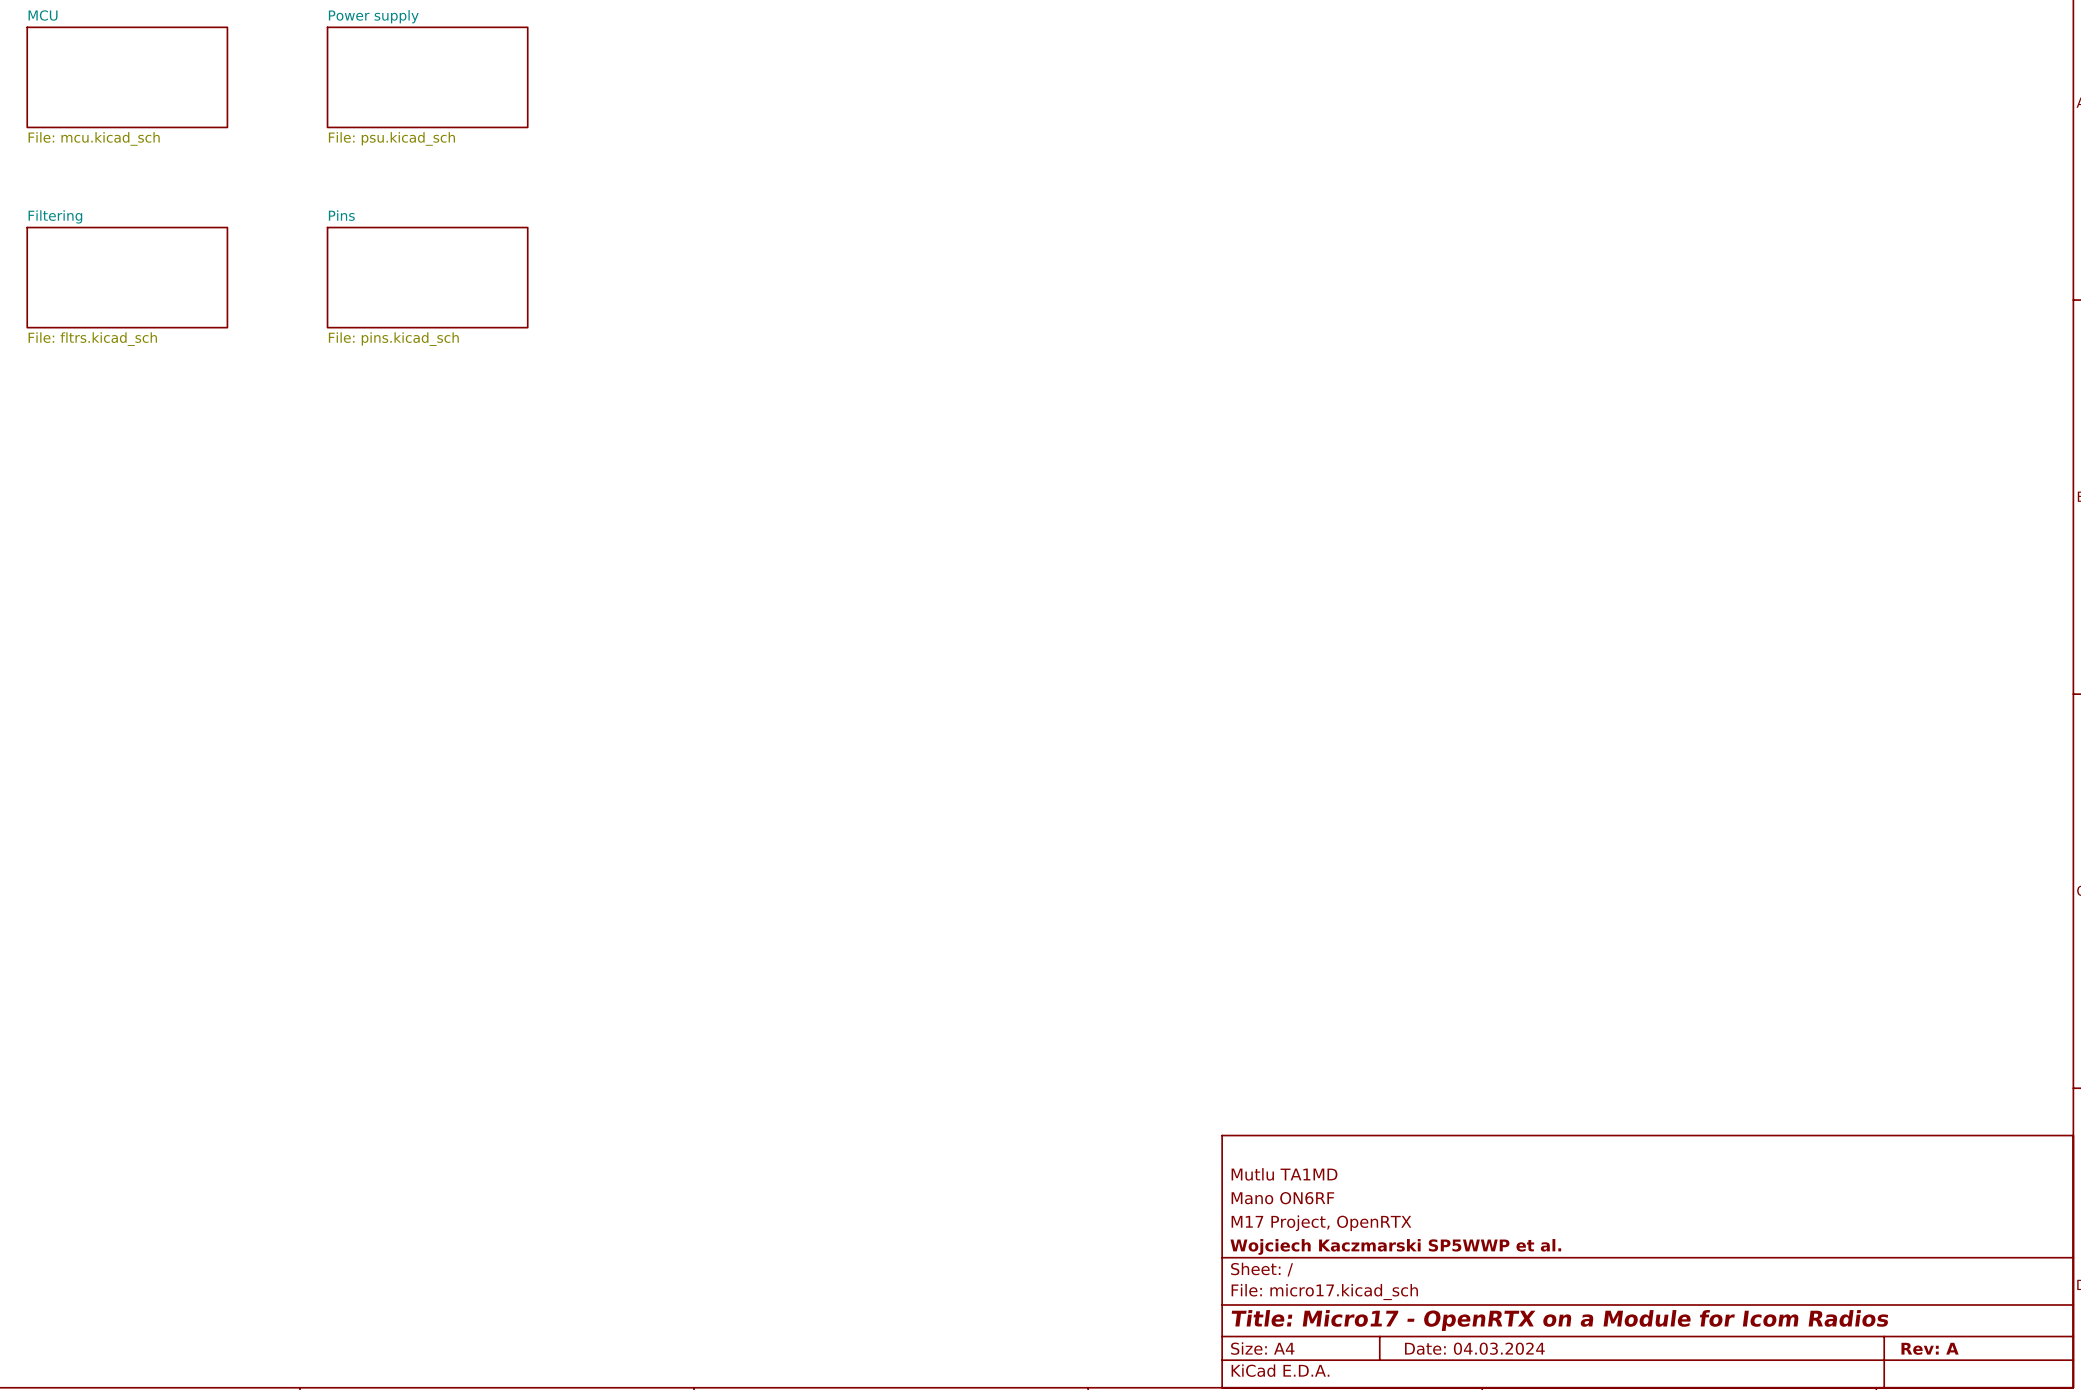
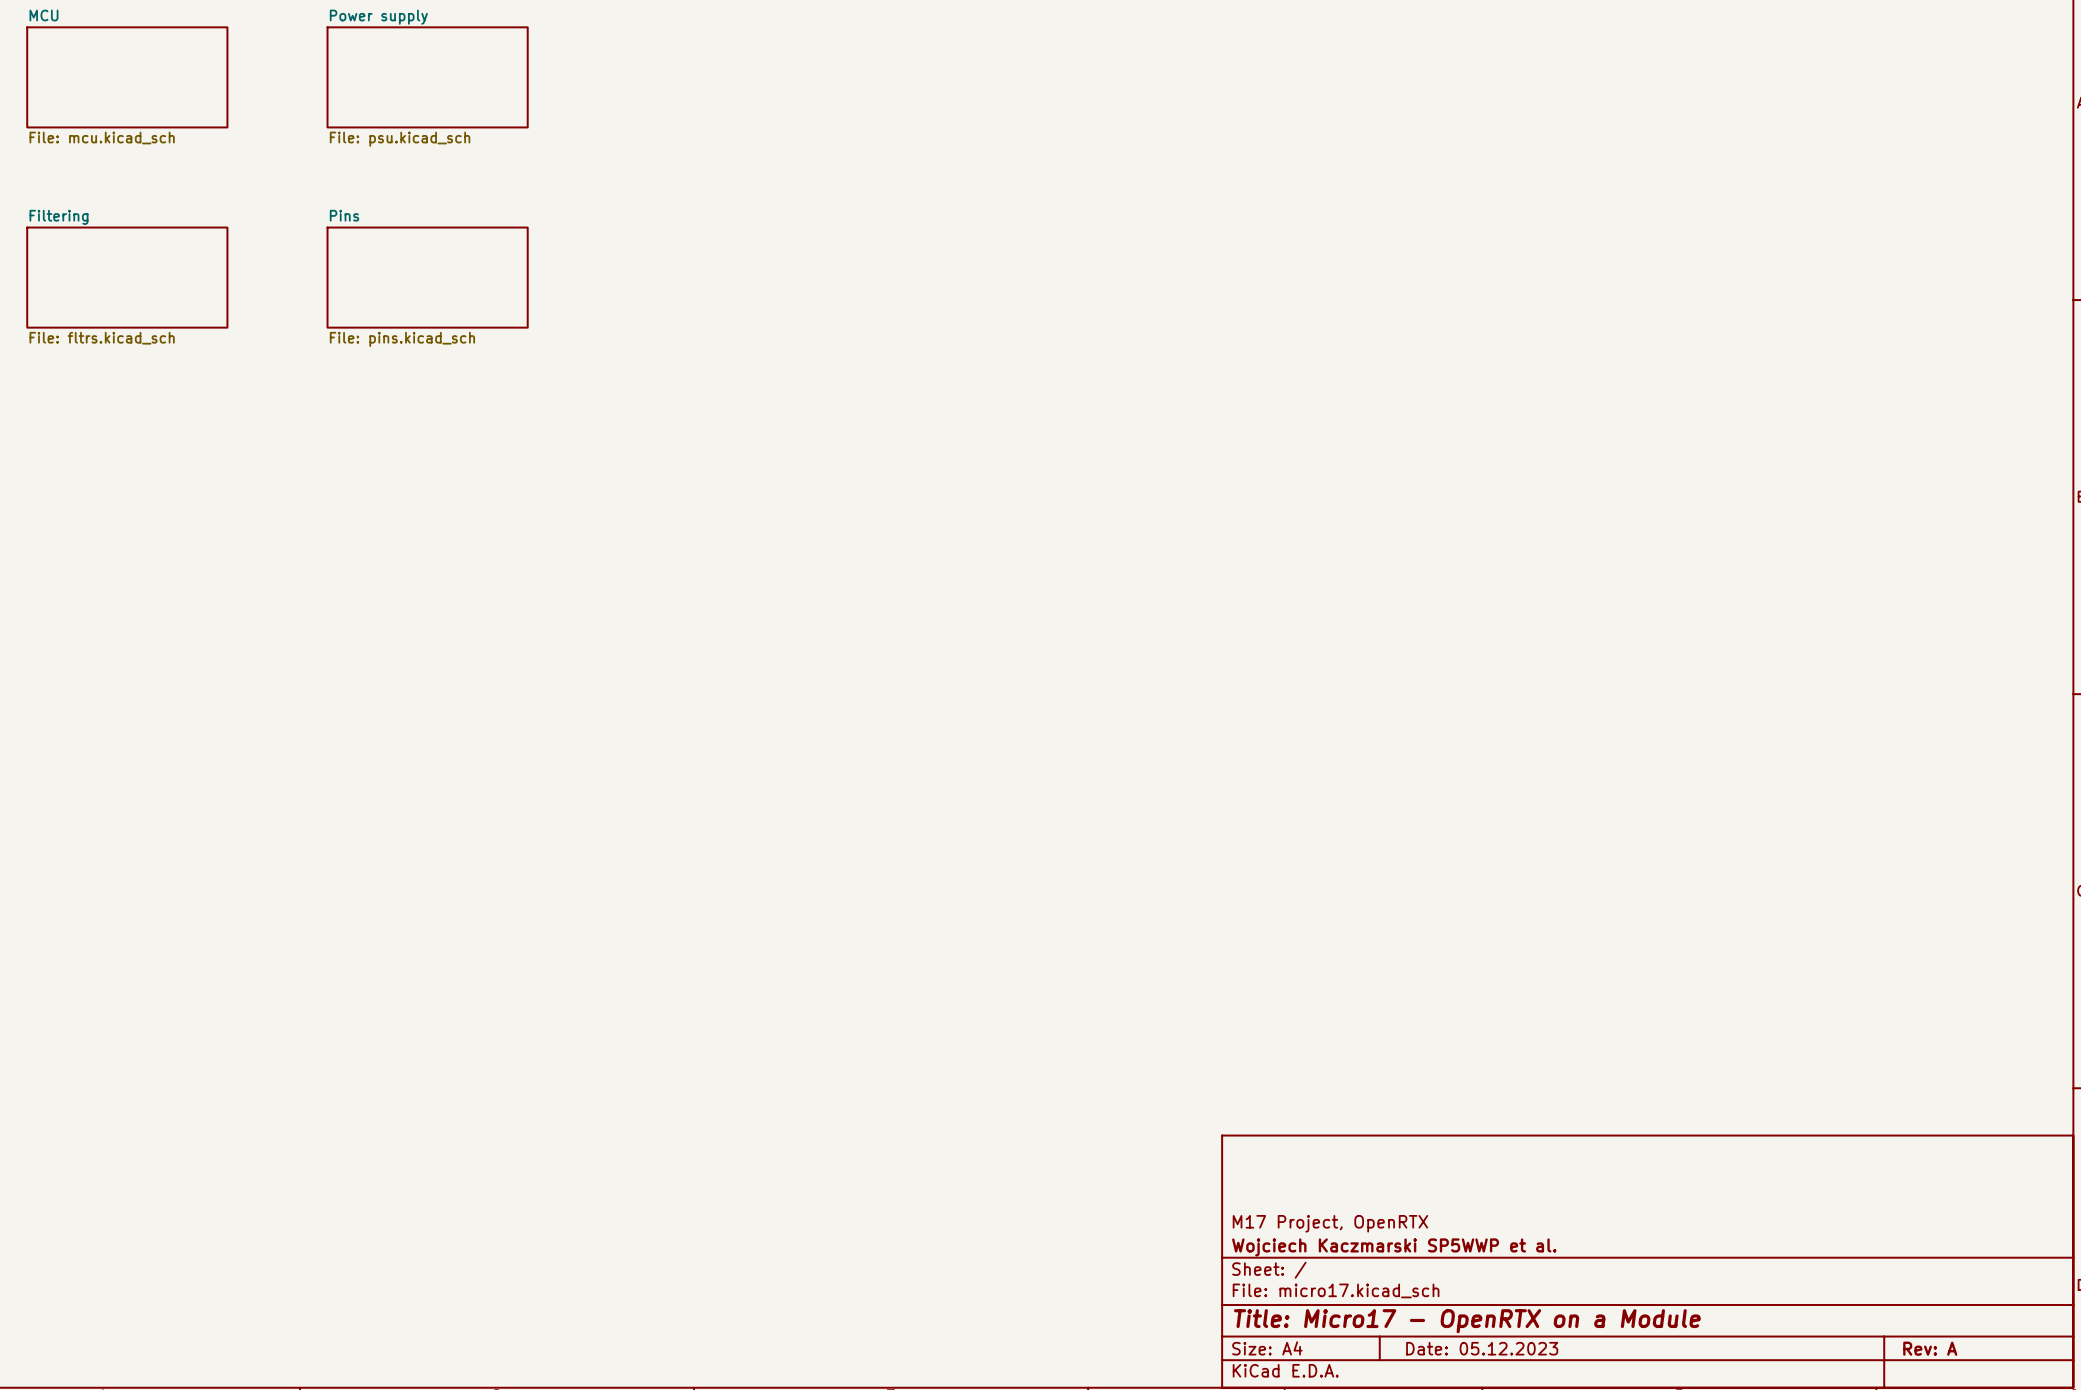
title block: Mutlu TA1MD (1284, 1174) -> none
title block: Mano ON6RF (1282, 1198) -> none
title block: Title: Micro17 - OpenRTX on a Module for Icom Radios (1559, 1320) -> Title: Micro17 - OpenRTX on a Module (1467, 1321)
title block: Date: 04.03.2024 (1474, 1348) -> Date: 05.12.2023 (1482, 1348)

